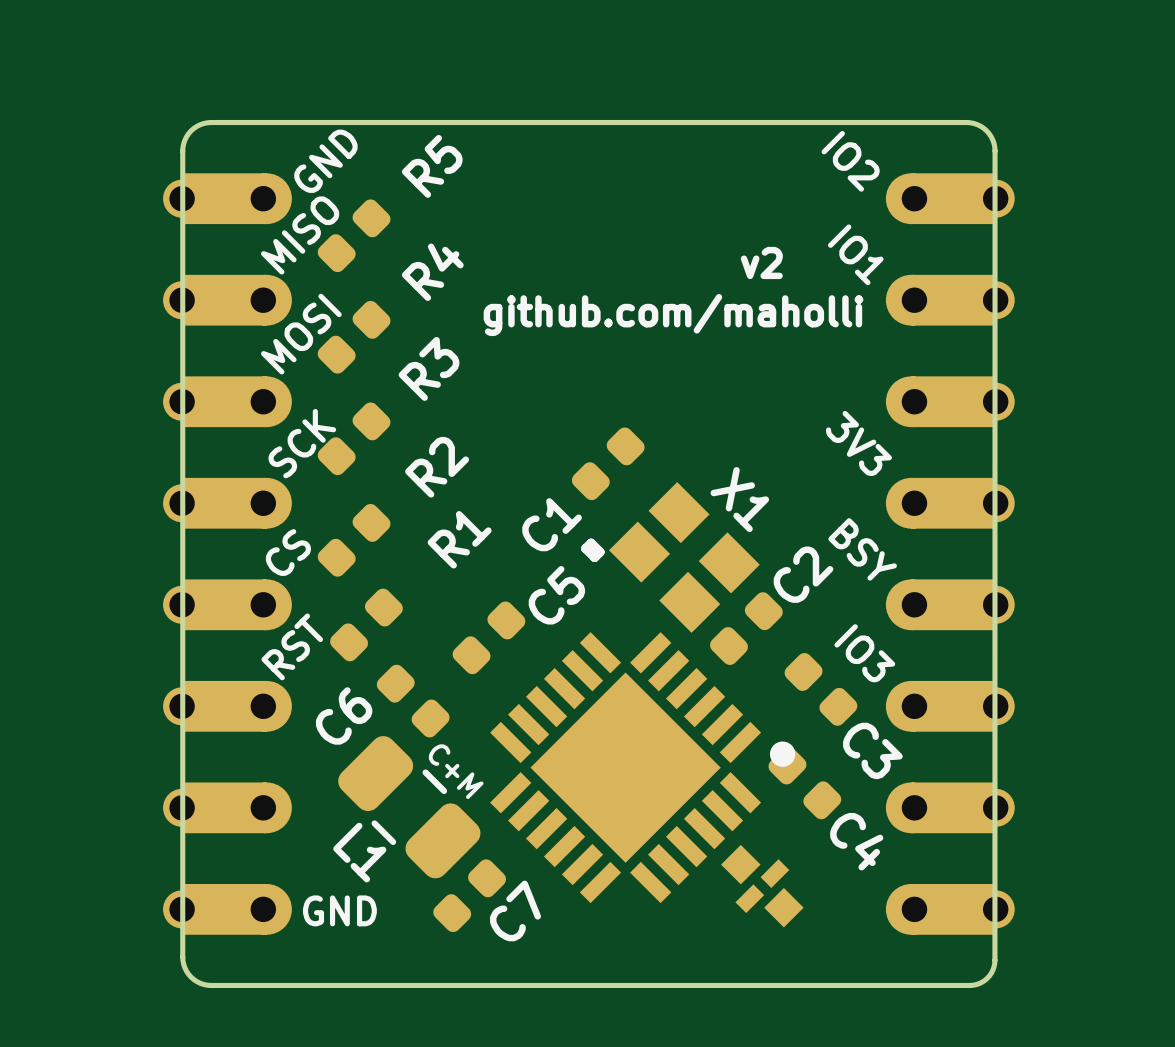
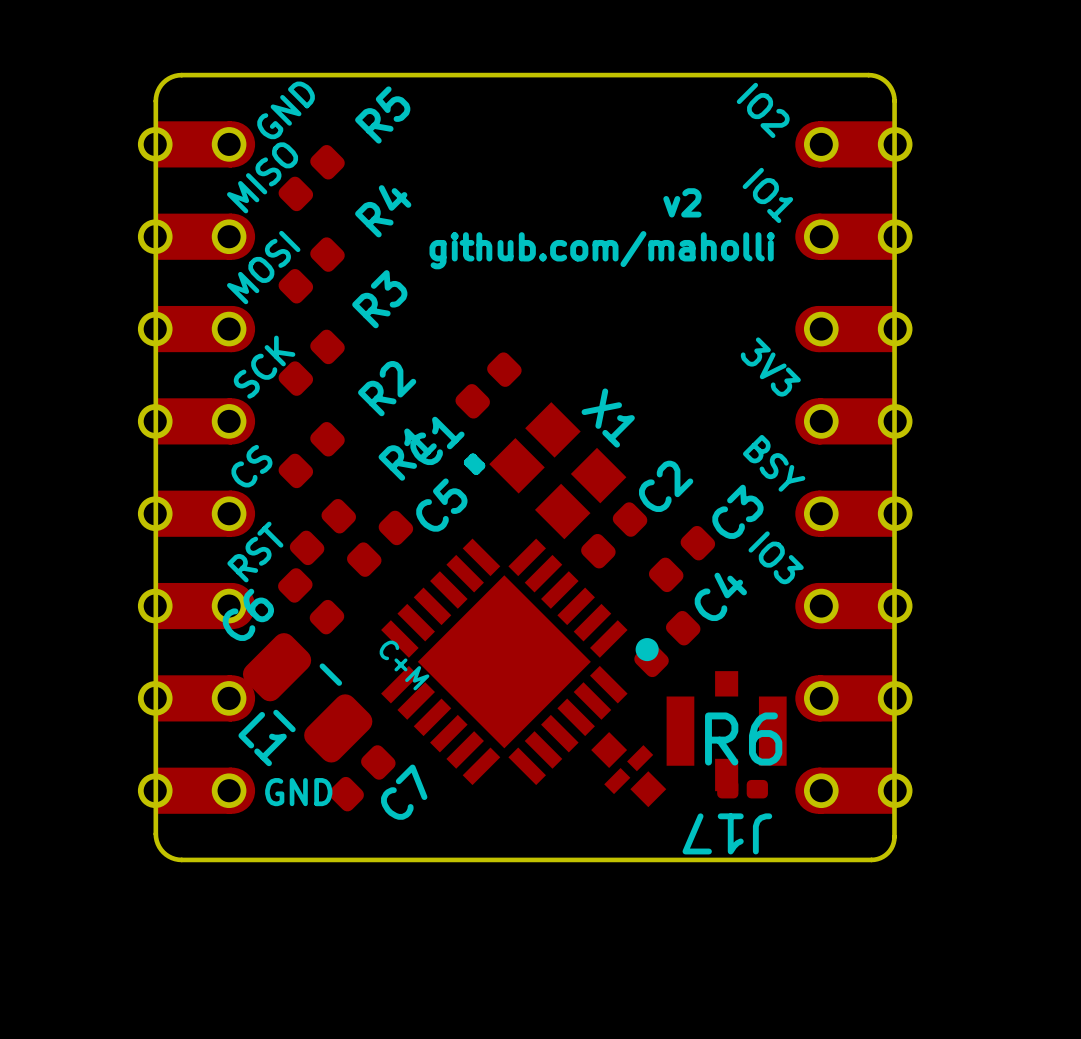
C1 position: (608, 463) -> (488, 385)
X1 position: (670, 557) -> (545, 470)
C2 position: (746, 628) -> (614, 535)
C5 position: (488, 637) -> (380, 543)
C3 rotation: 0° (820, 689) -> 90° clockwise (682, 559)
C3 position: (820, 689) -> (682, 559)
C6 position: (413, 701) -> (311, 601)
C3 name position: C3 (872, 750) -> C3 (737, 511)
part position: (642, 767) -> (519, 661)
C4 rotation: 0° (804, 782) -> 90° clockwise (667, 644)
C4 position: (804, 782) -> (667, 644)
L1 position: (409, 807) -> (307, 697)
C4 name position: C4 (856, 841) -> C4 (720, 596)
J17: none -> (726, 731)
part position: (762, 886) -> (628, 769)
C7 position: (469, 895) -> (362, 778)
R6: none -> (742, 789)

